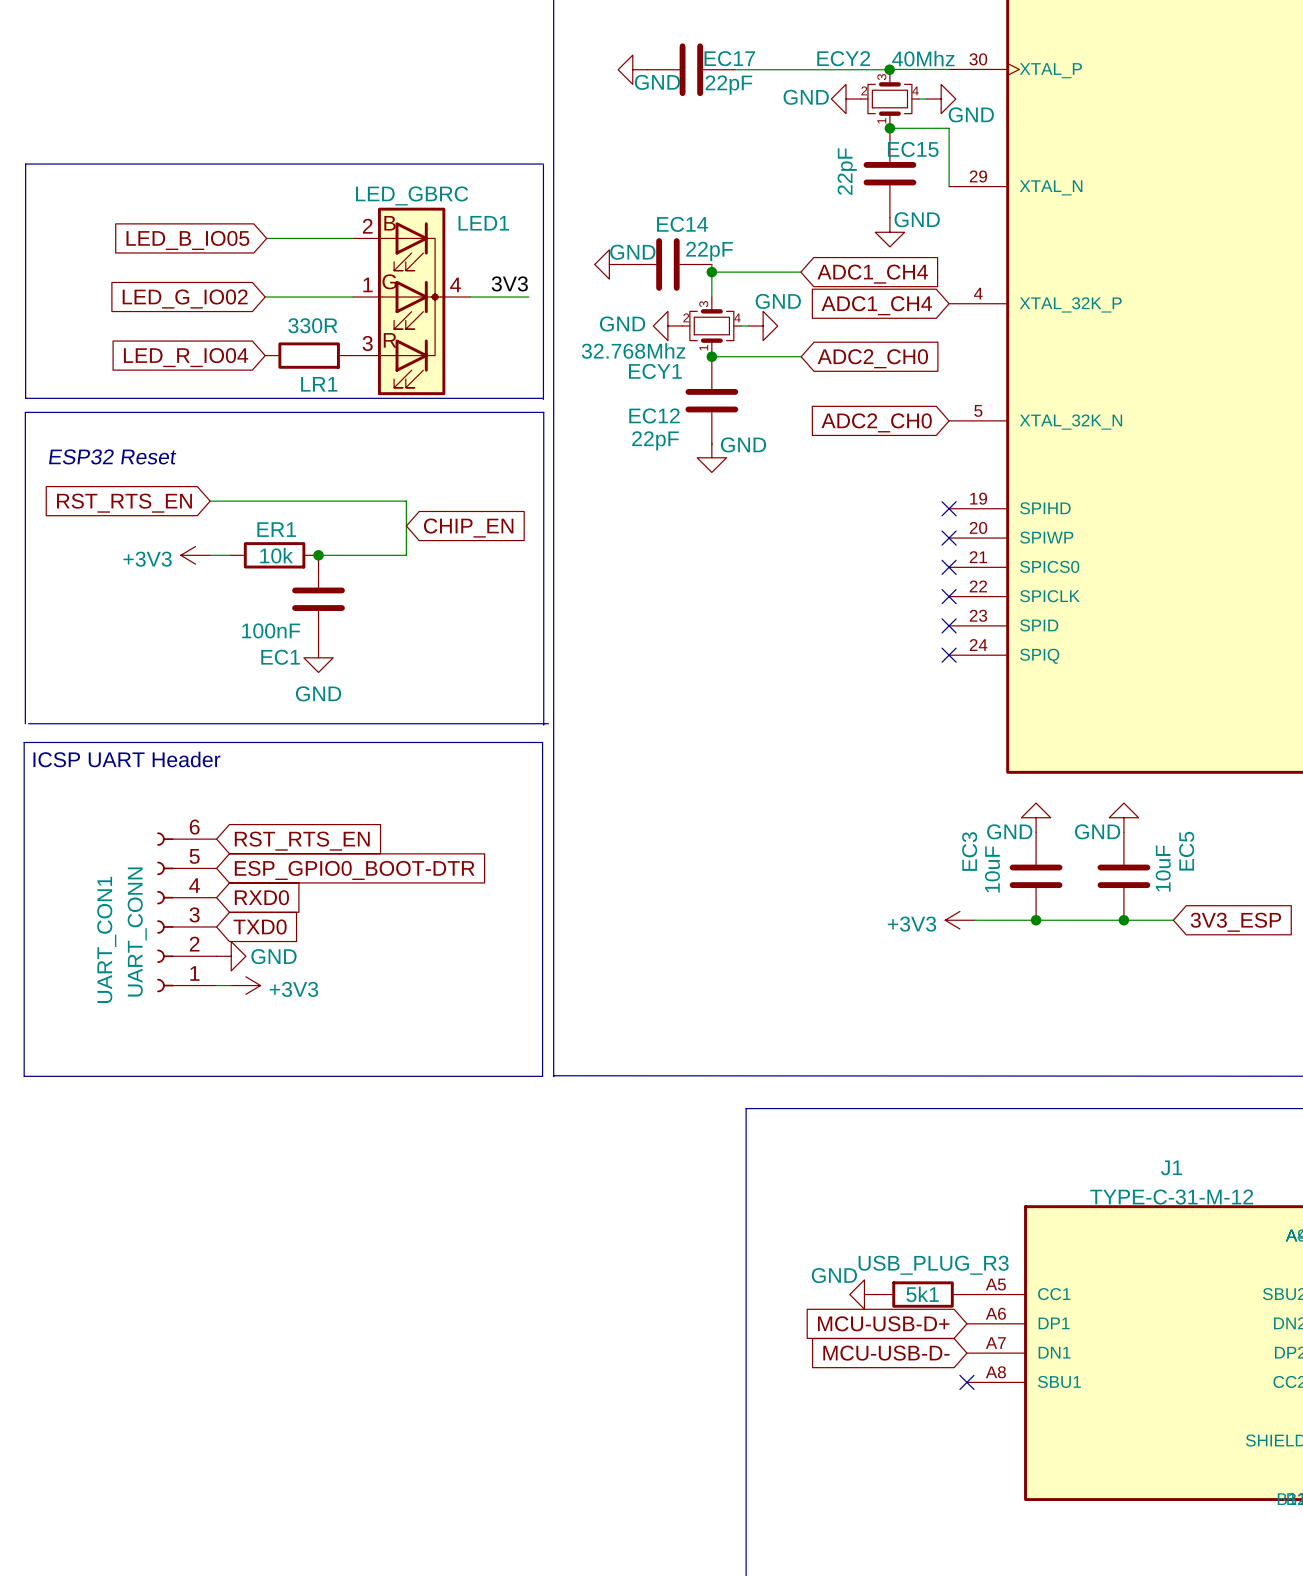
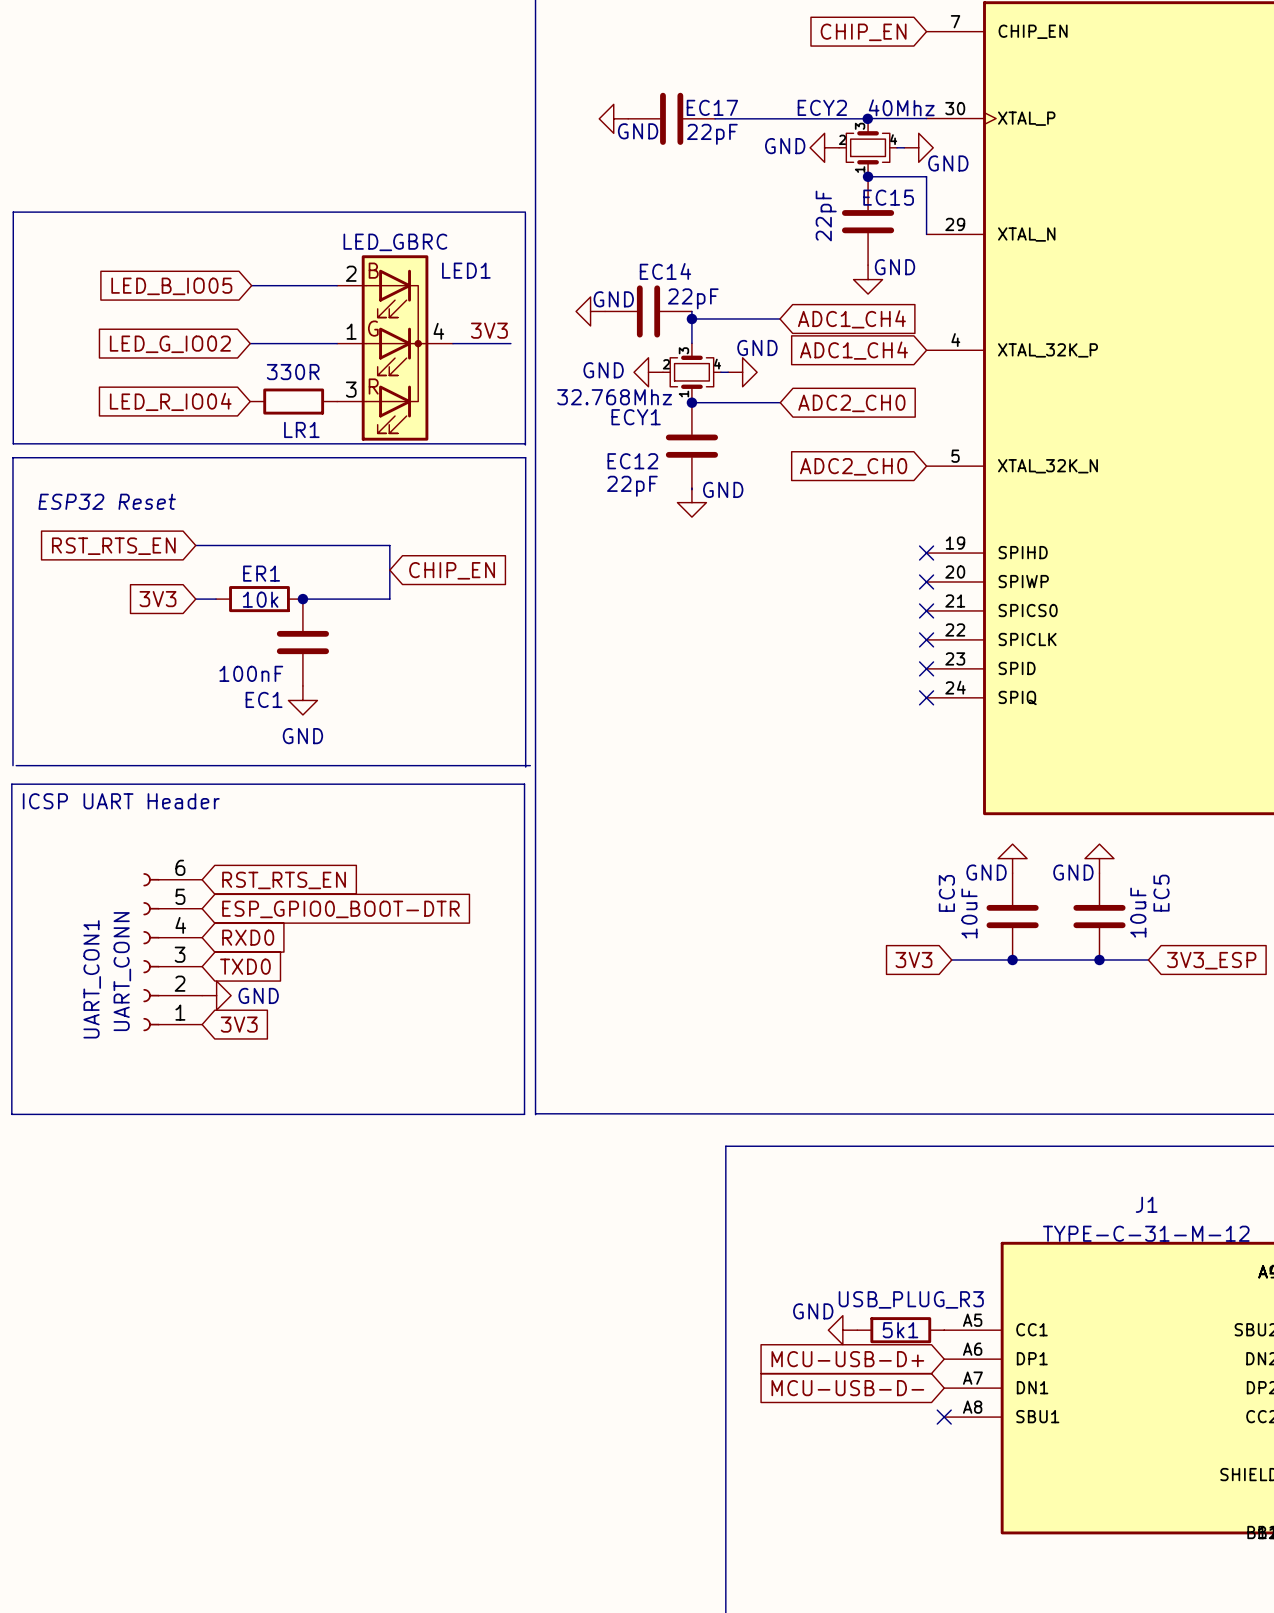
global label: none -> 3V3 (157, 599)
power symbol: +3V3 (195, 555) -> none
global label: none -> 3V3 (913, 959)
power symbol: +3V3 (959, 920) -> none
wire: (216, 985) (231, 985) -> none
power symbol: +3V3 (245, 985) -> none
global label: none -> 3V3 (239, 1024)

